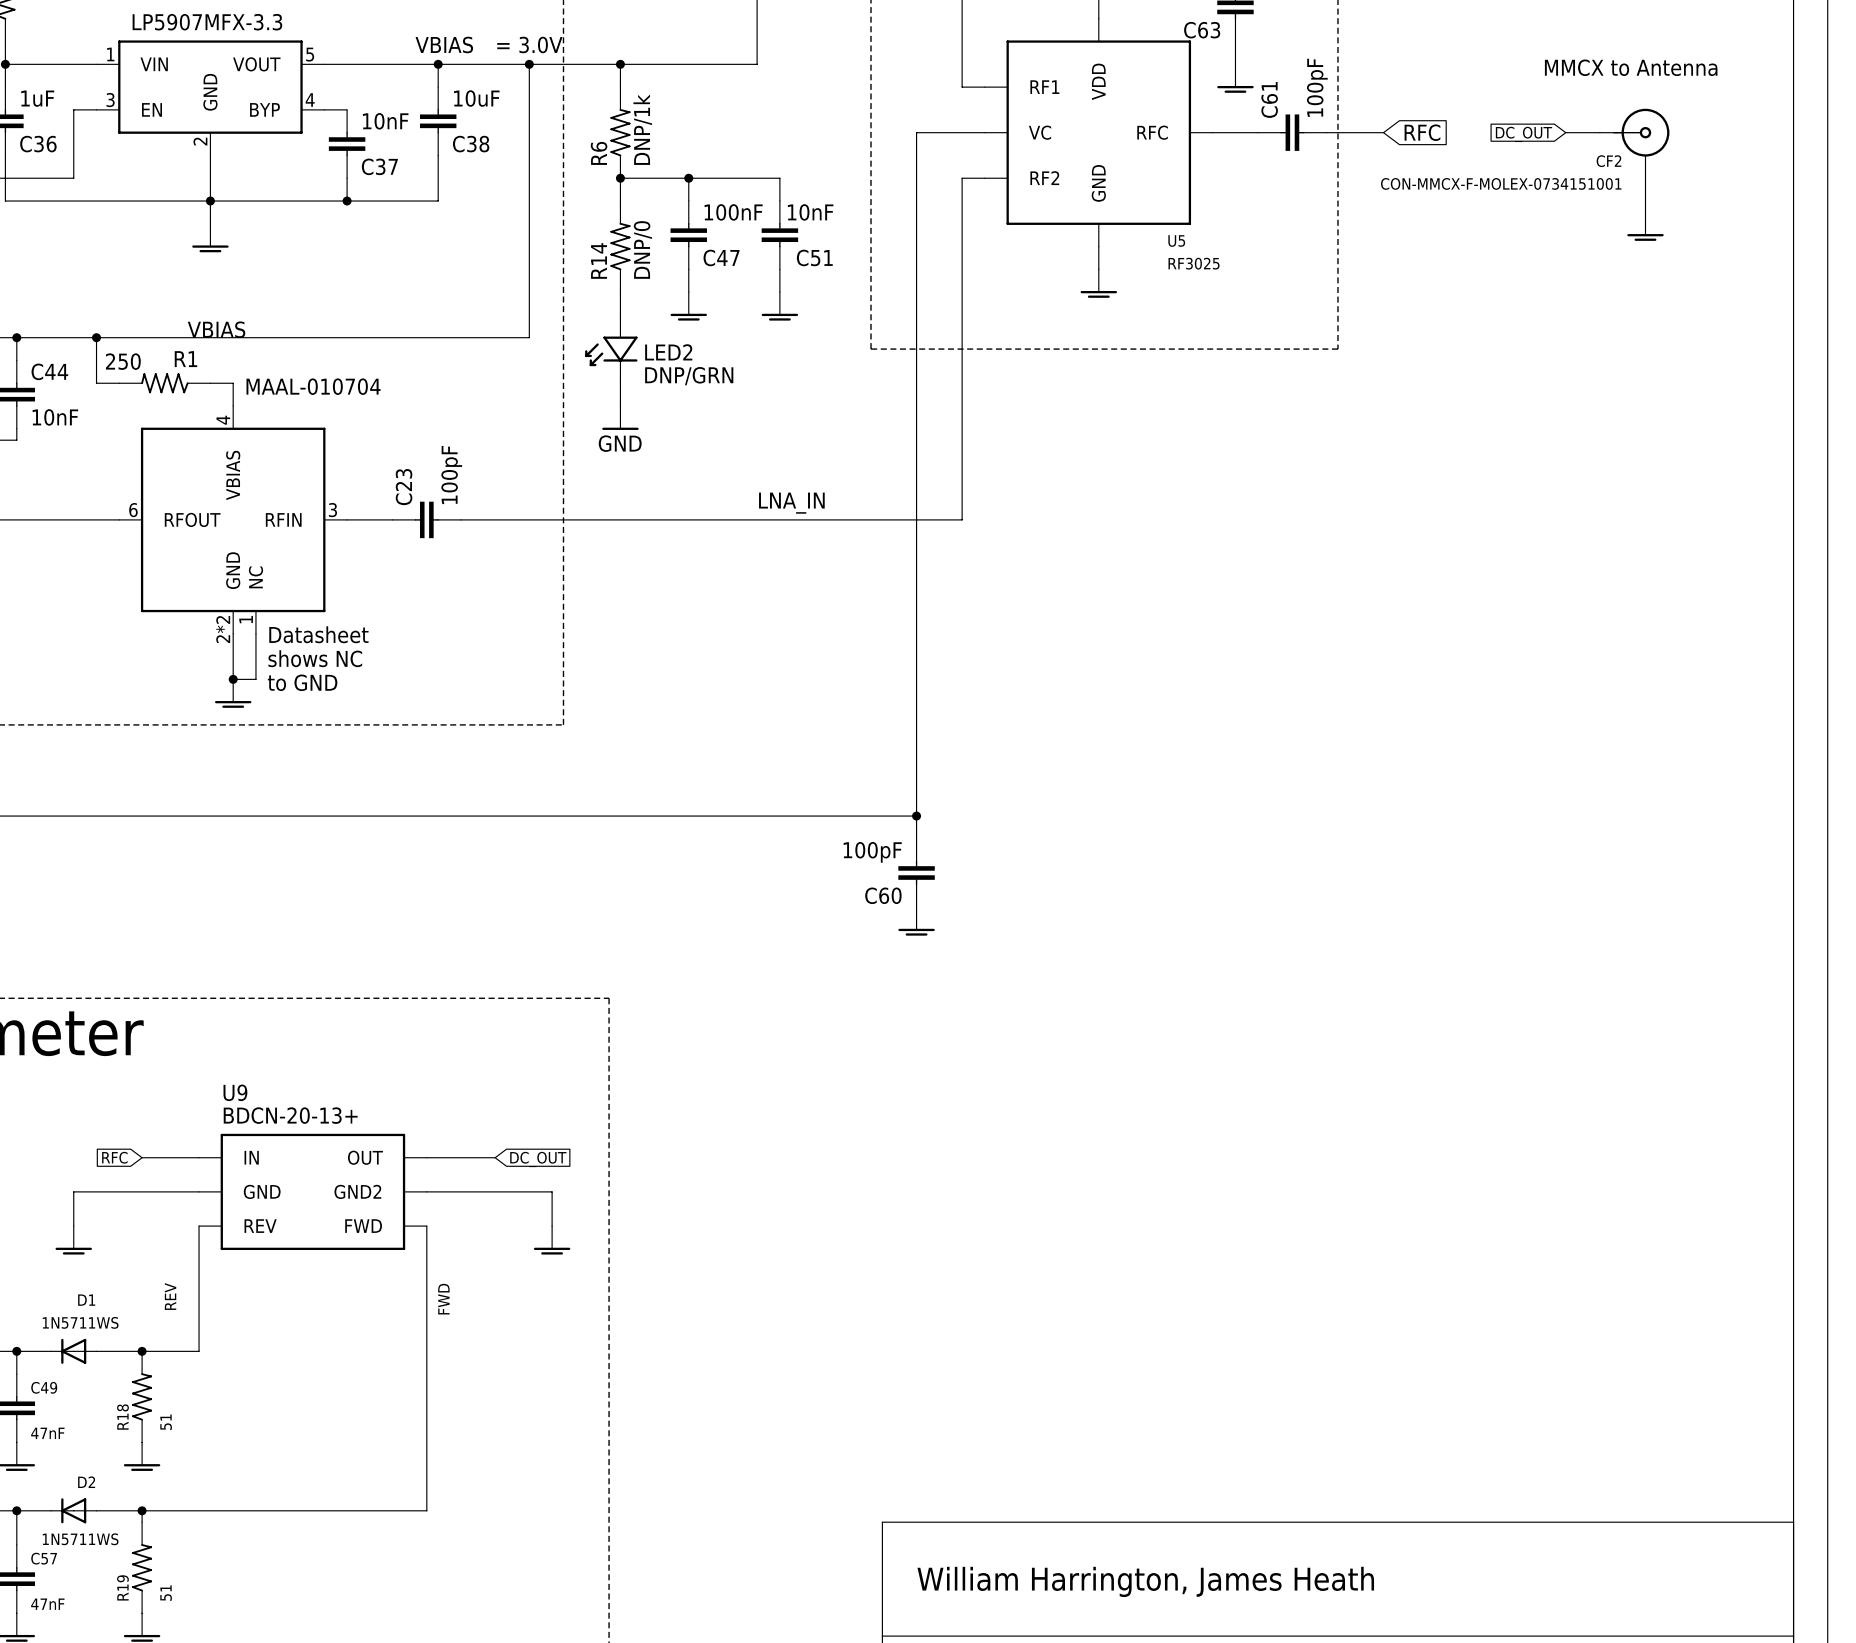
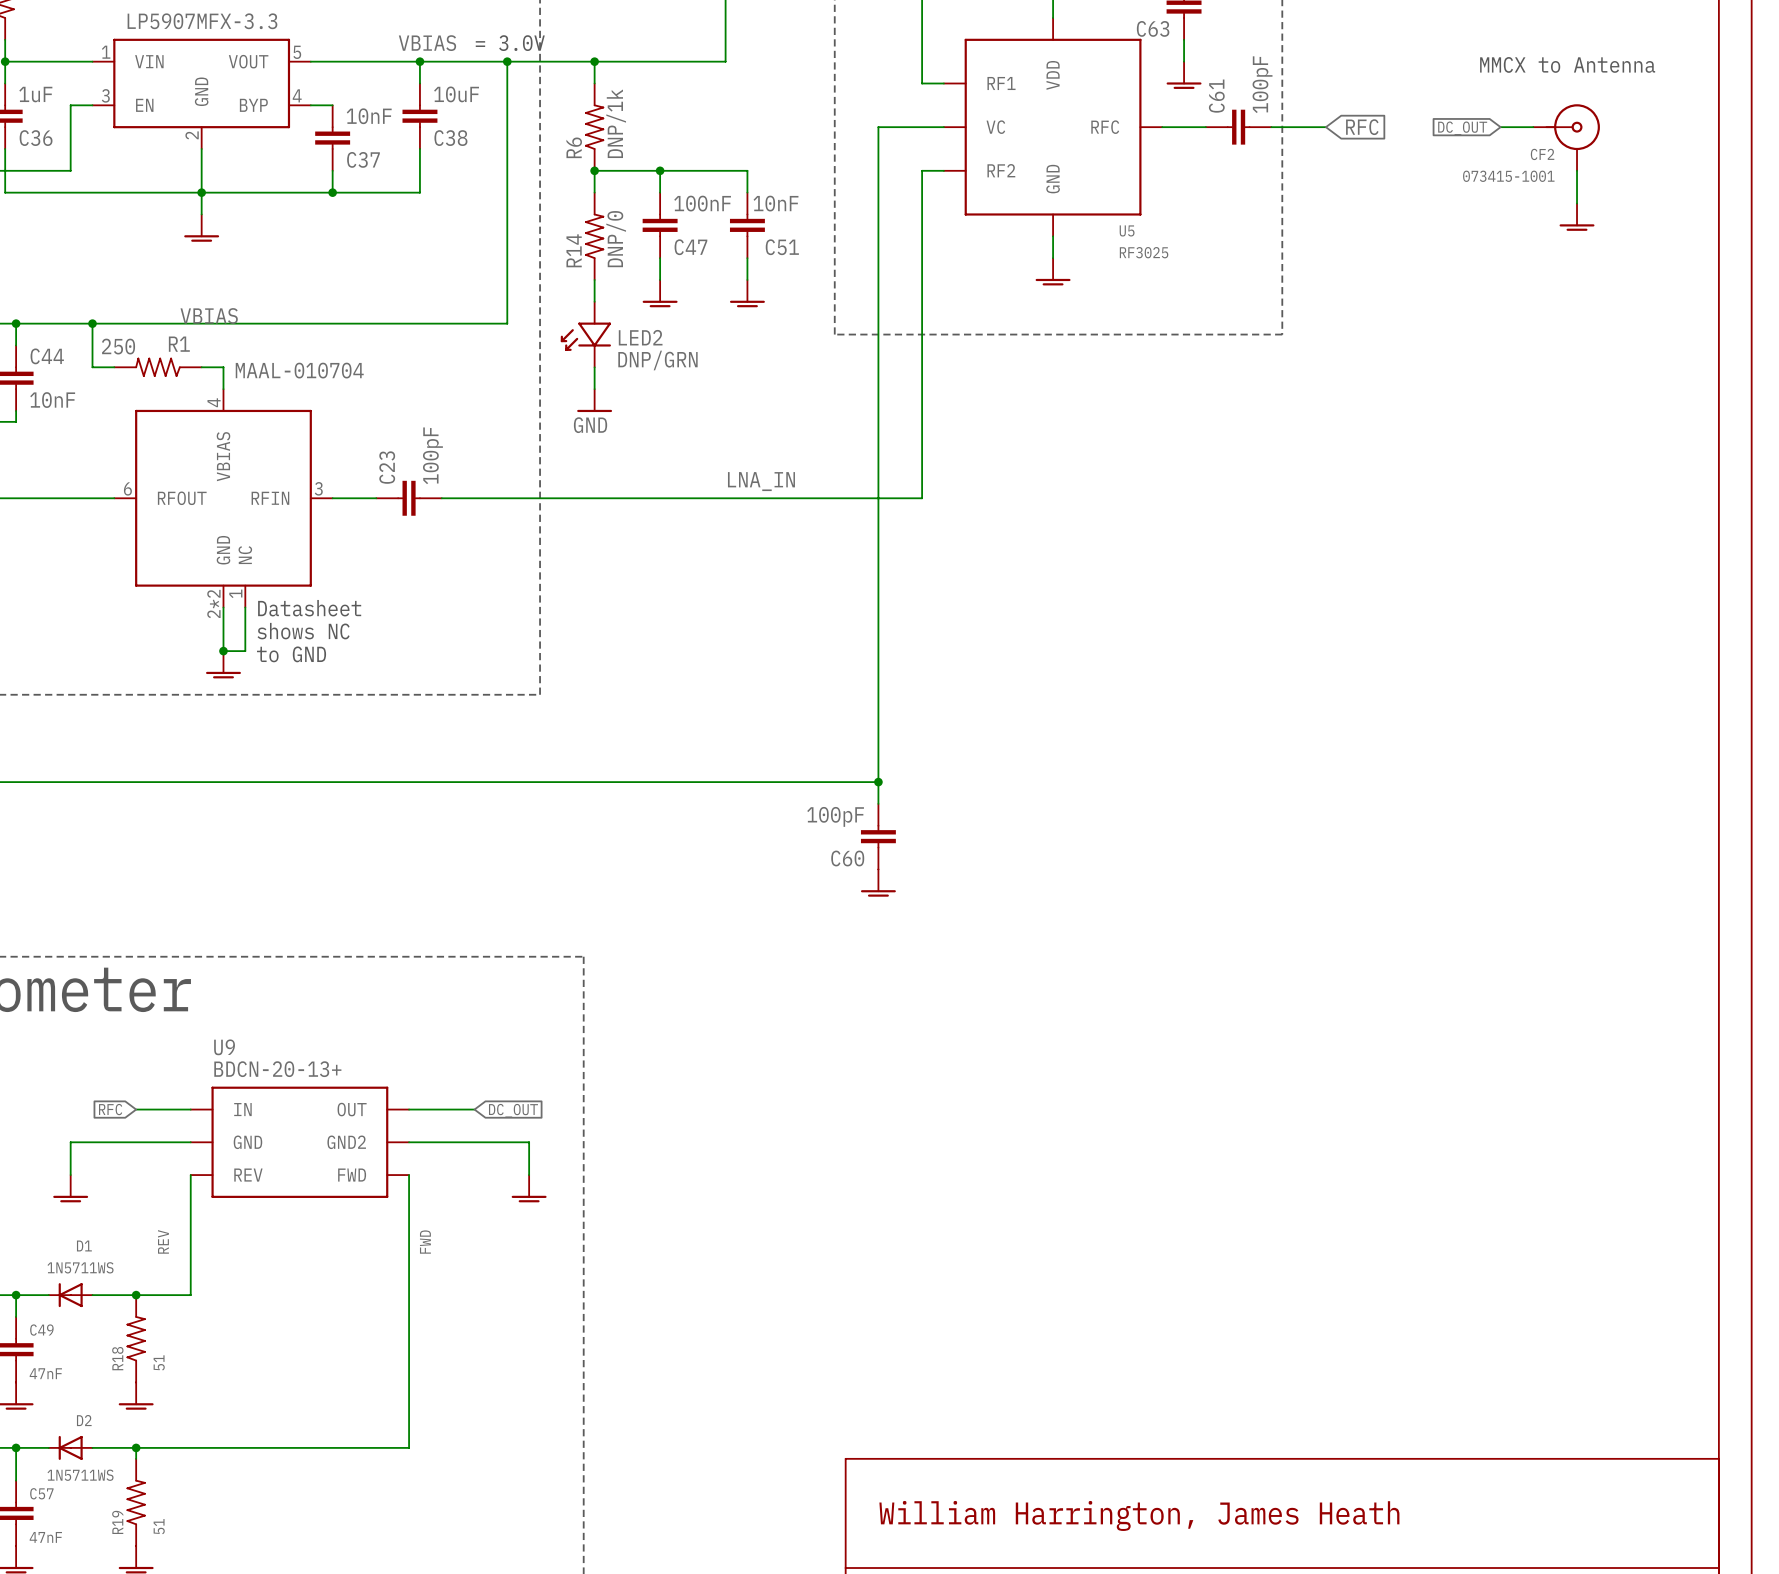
CF2 value: CON-MMCX-F-MOLEX-0734151001 (1501, 183) -> 073415-1001 (1508, 176)

